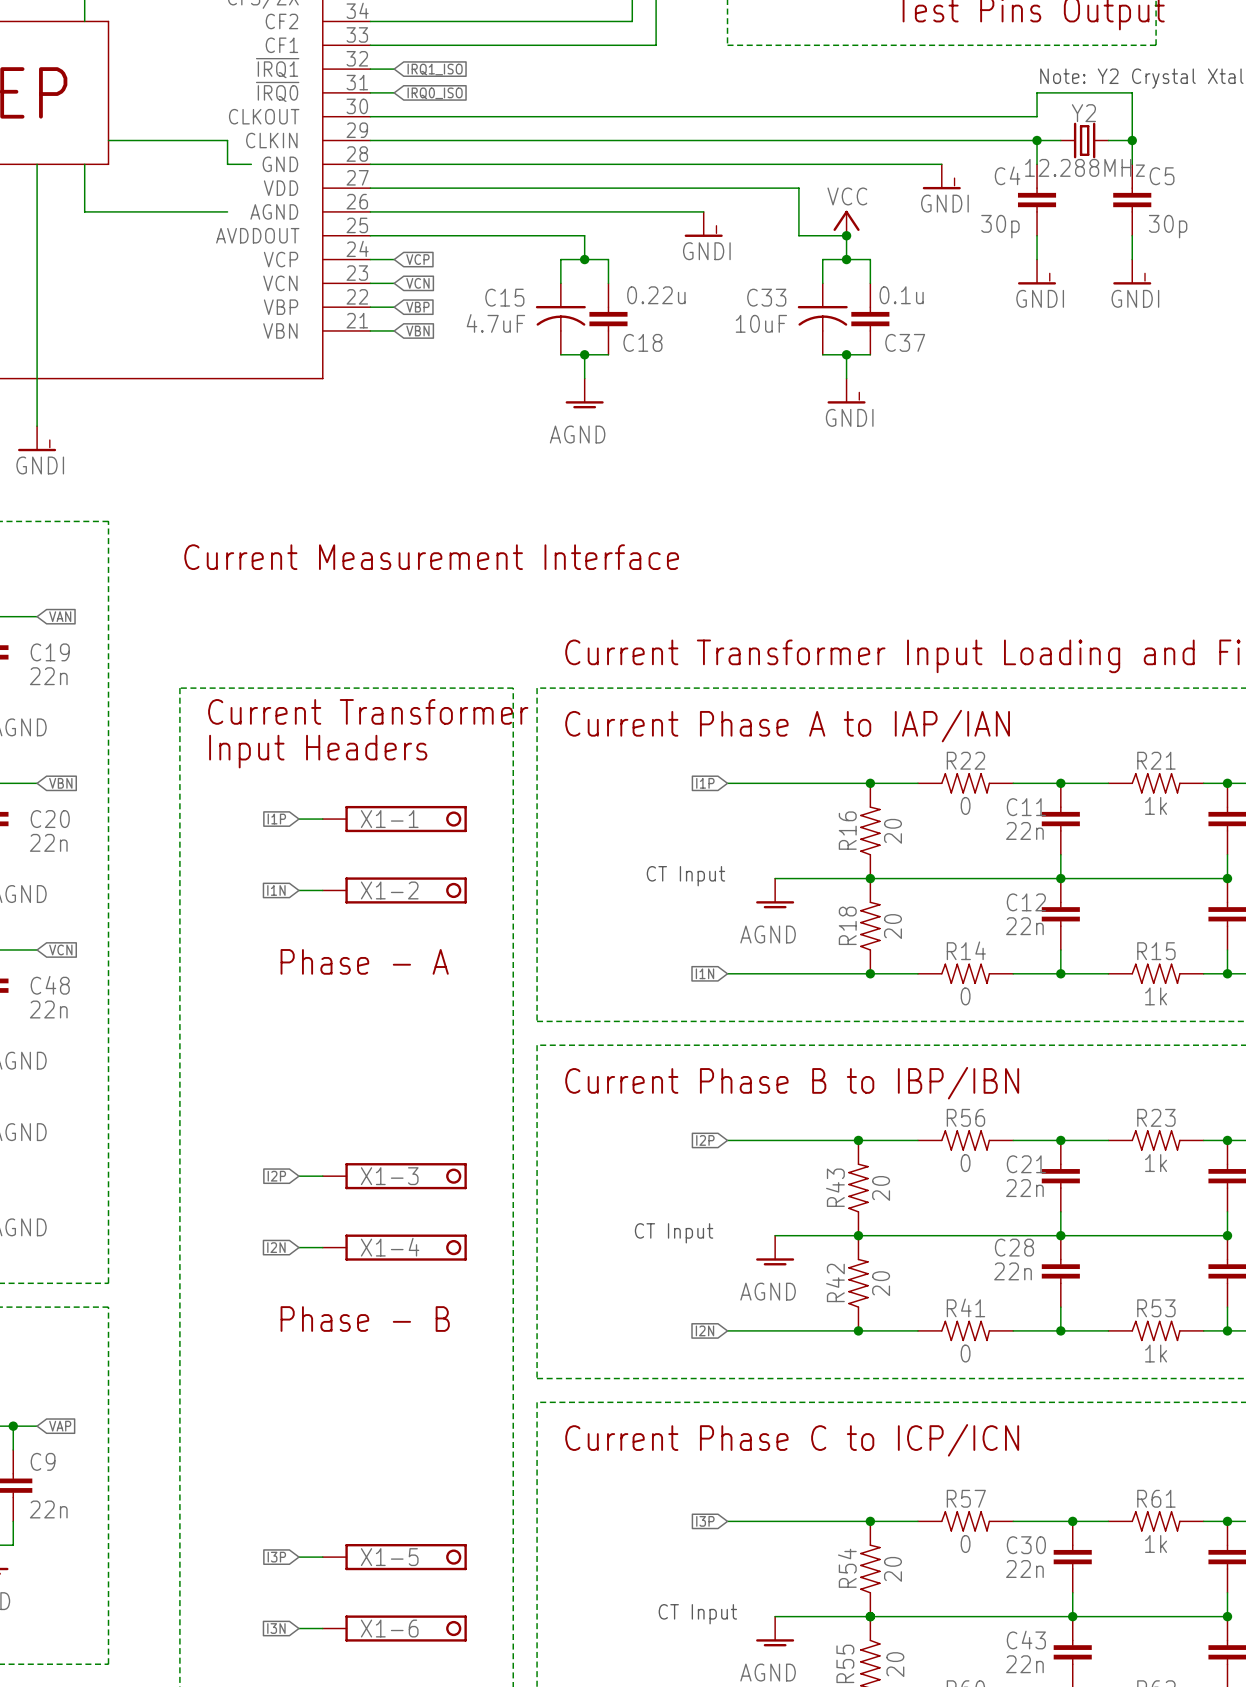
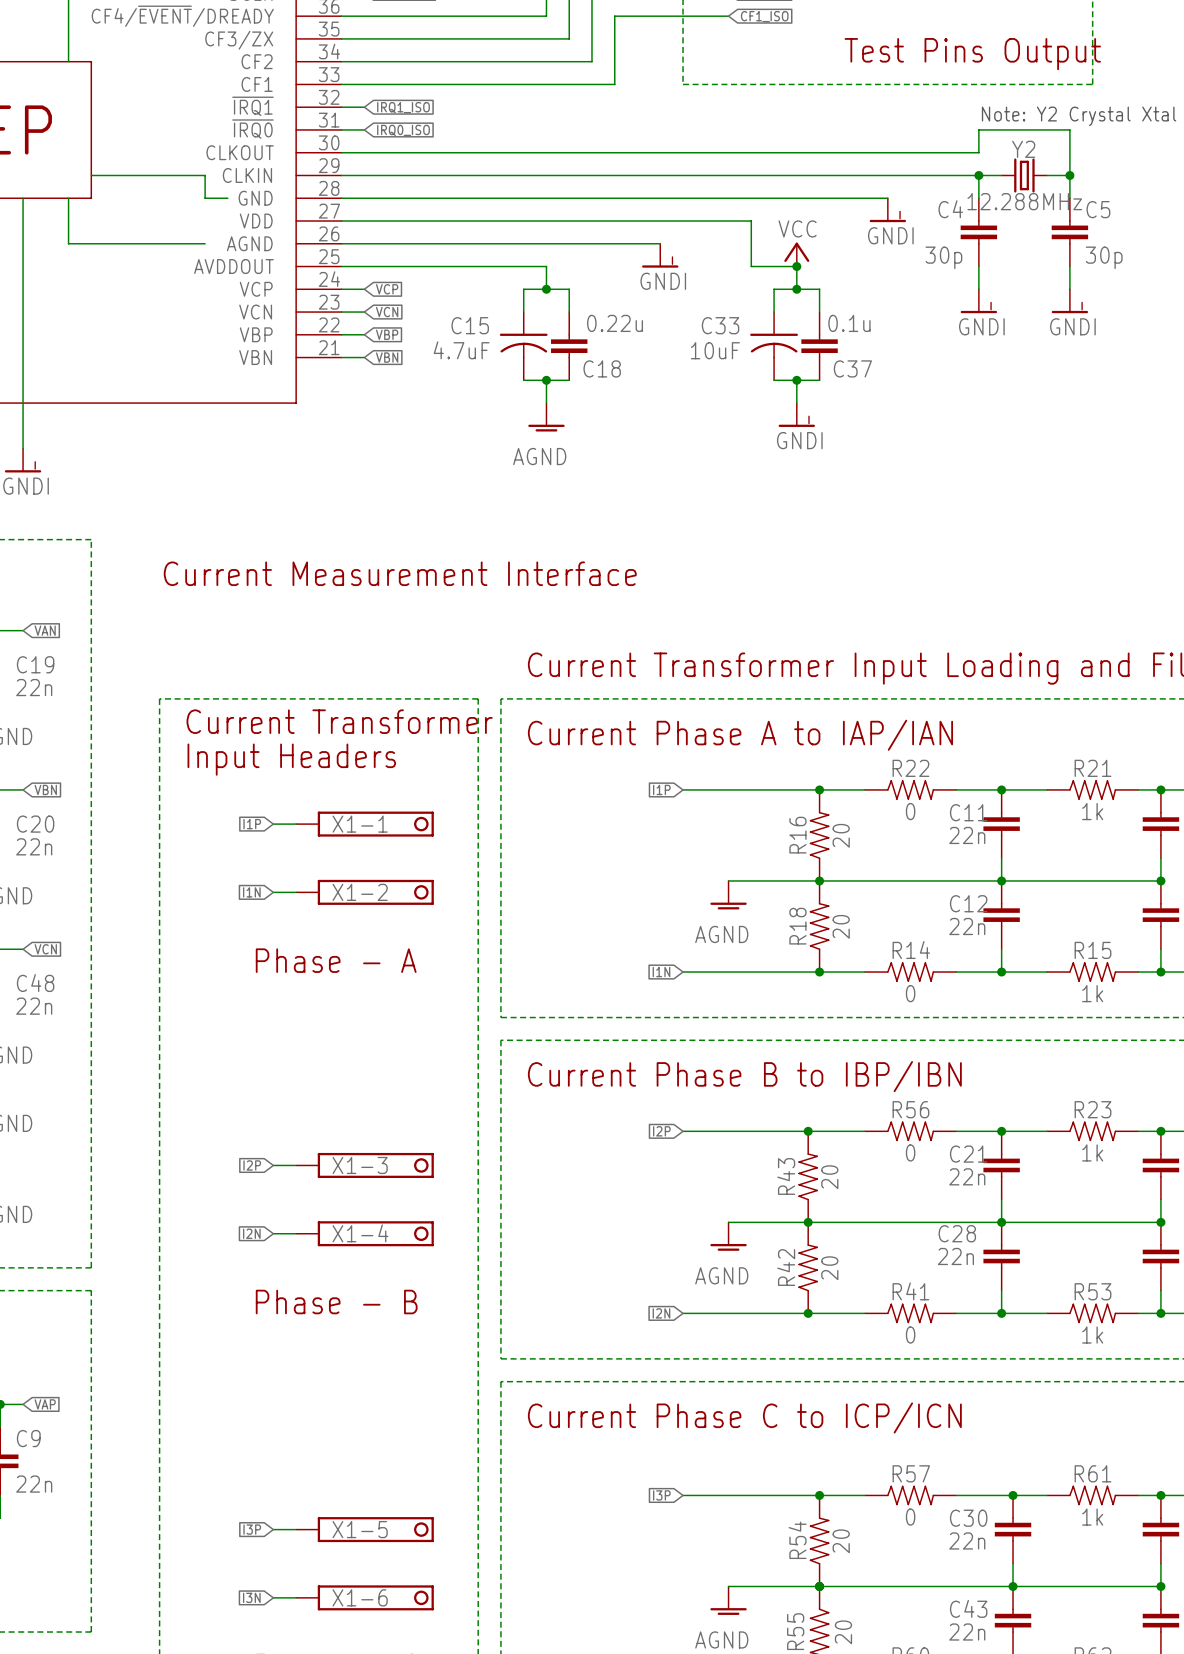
text: CT Input (685, 876) -> none
text: CT Input (674, 1233) -> none
text: CT Input (697, 1614) -> none

